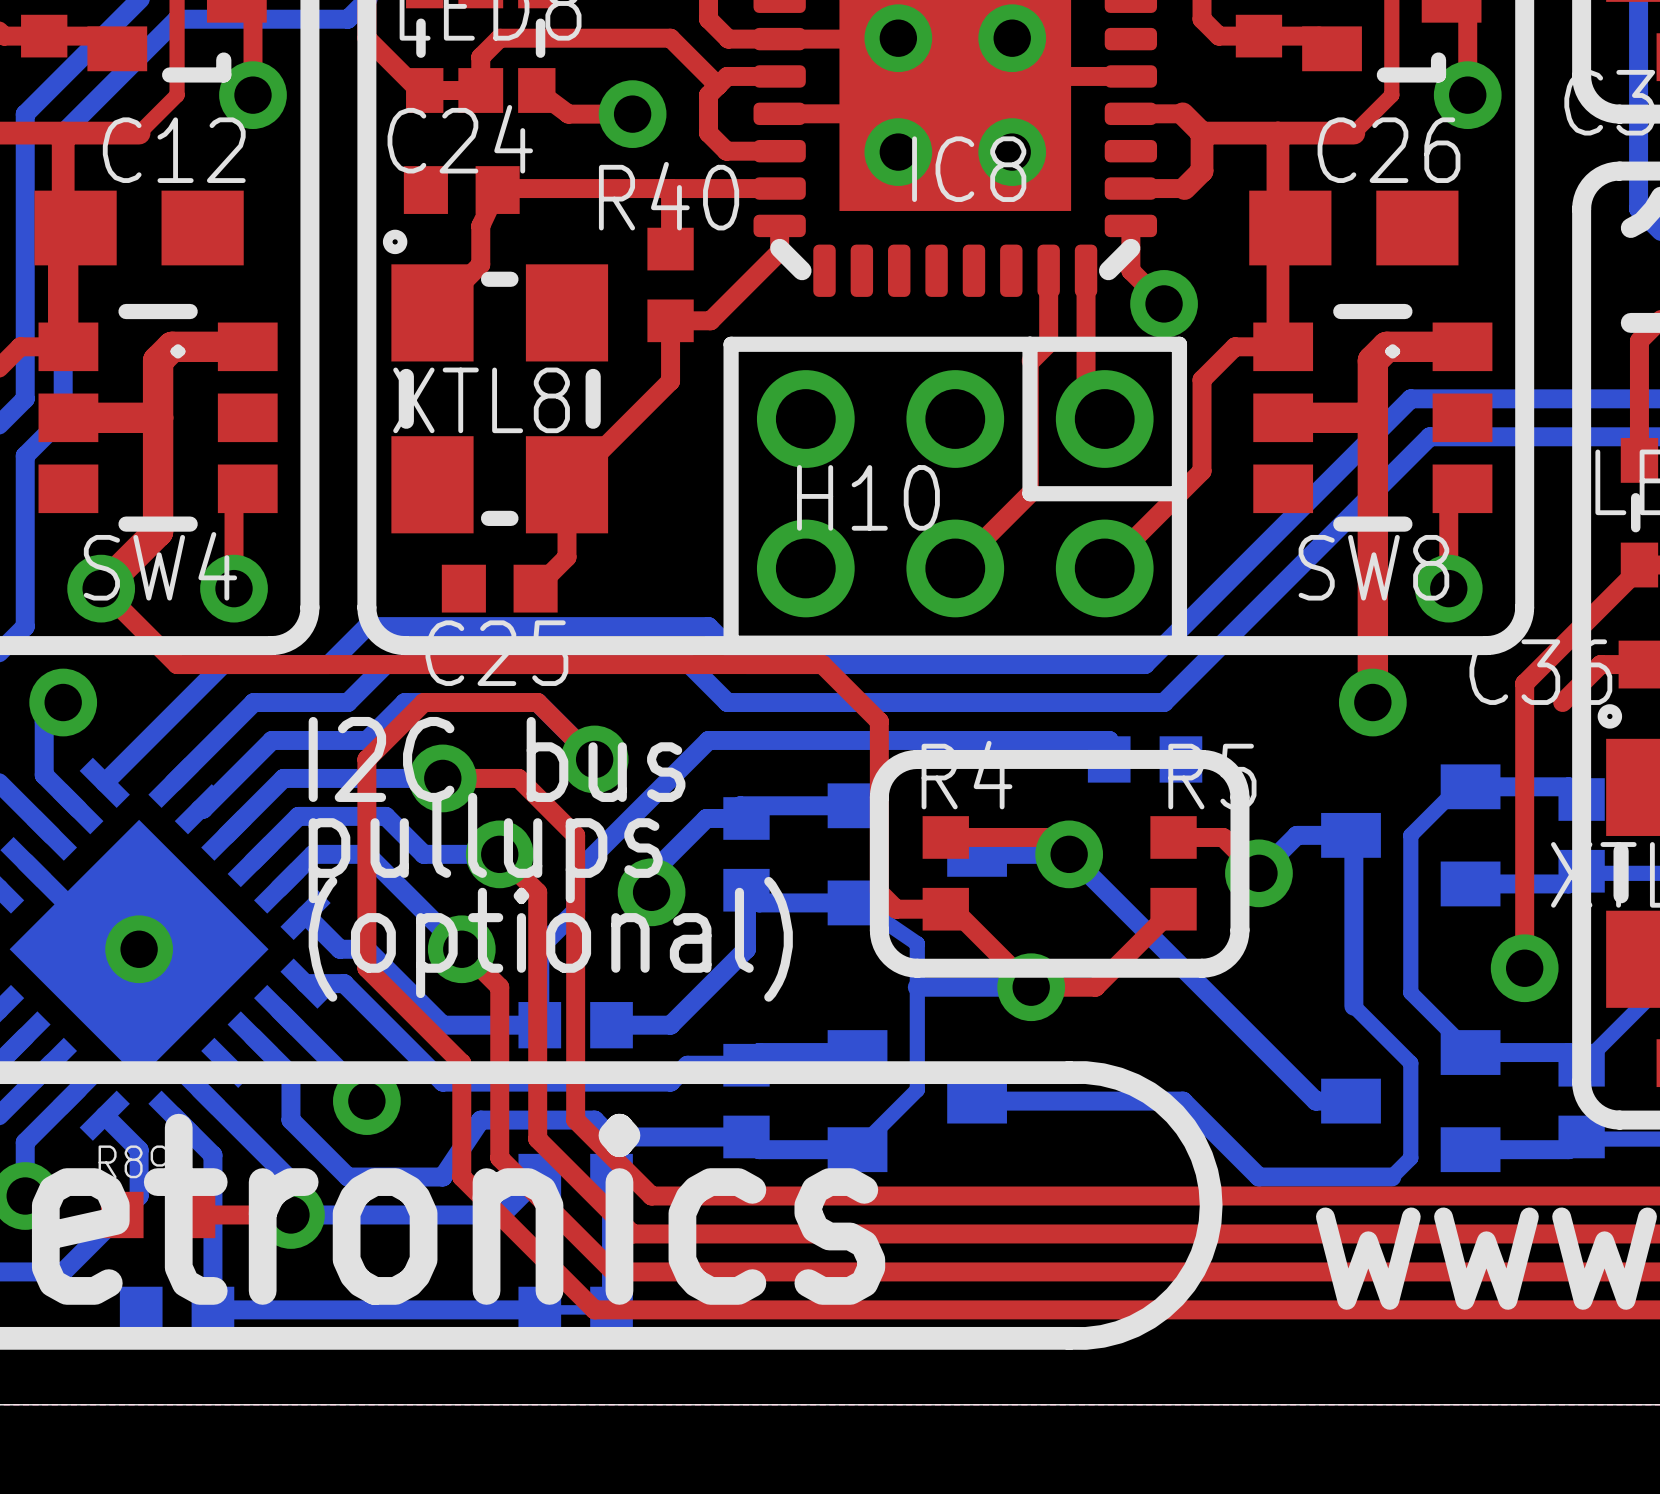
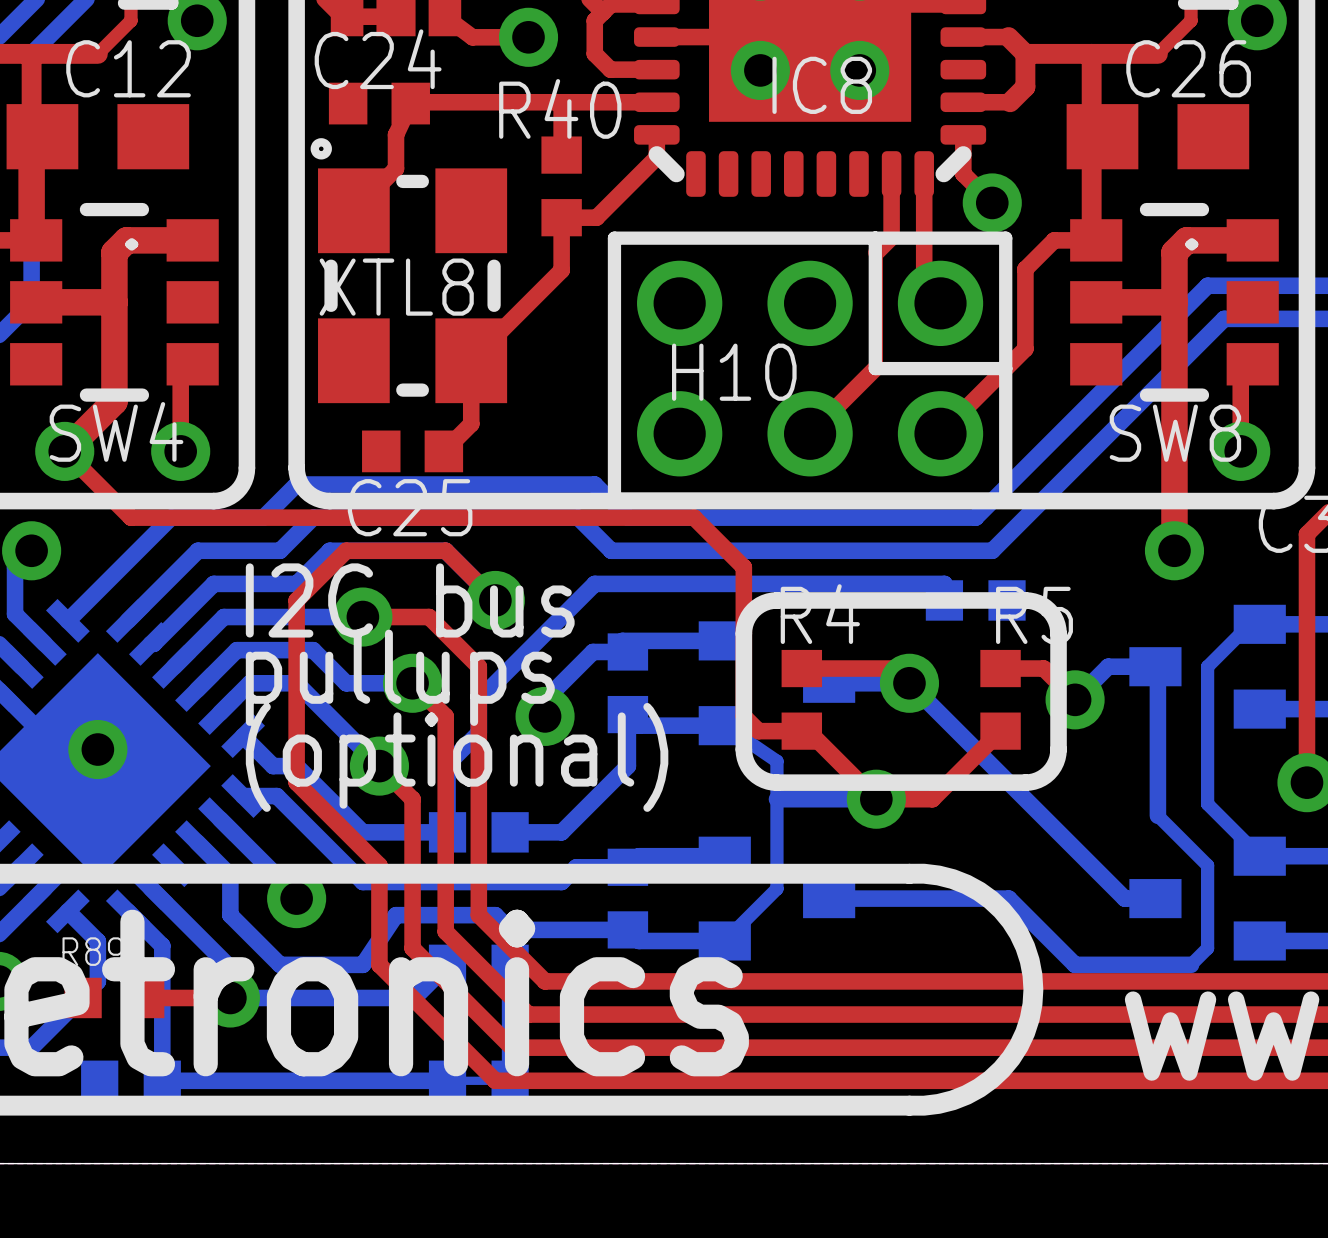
via position: (139, 949) -> (97, 749)

